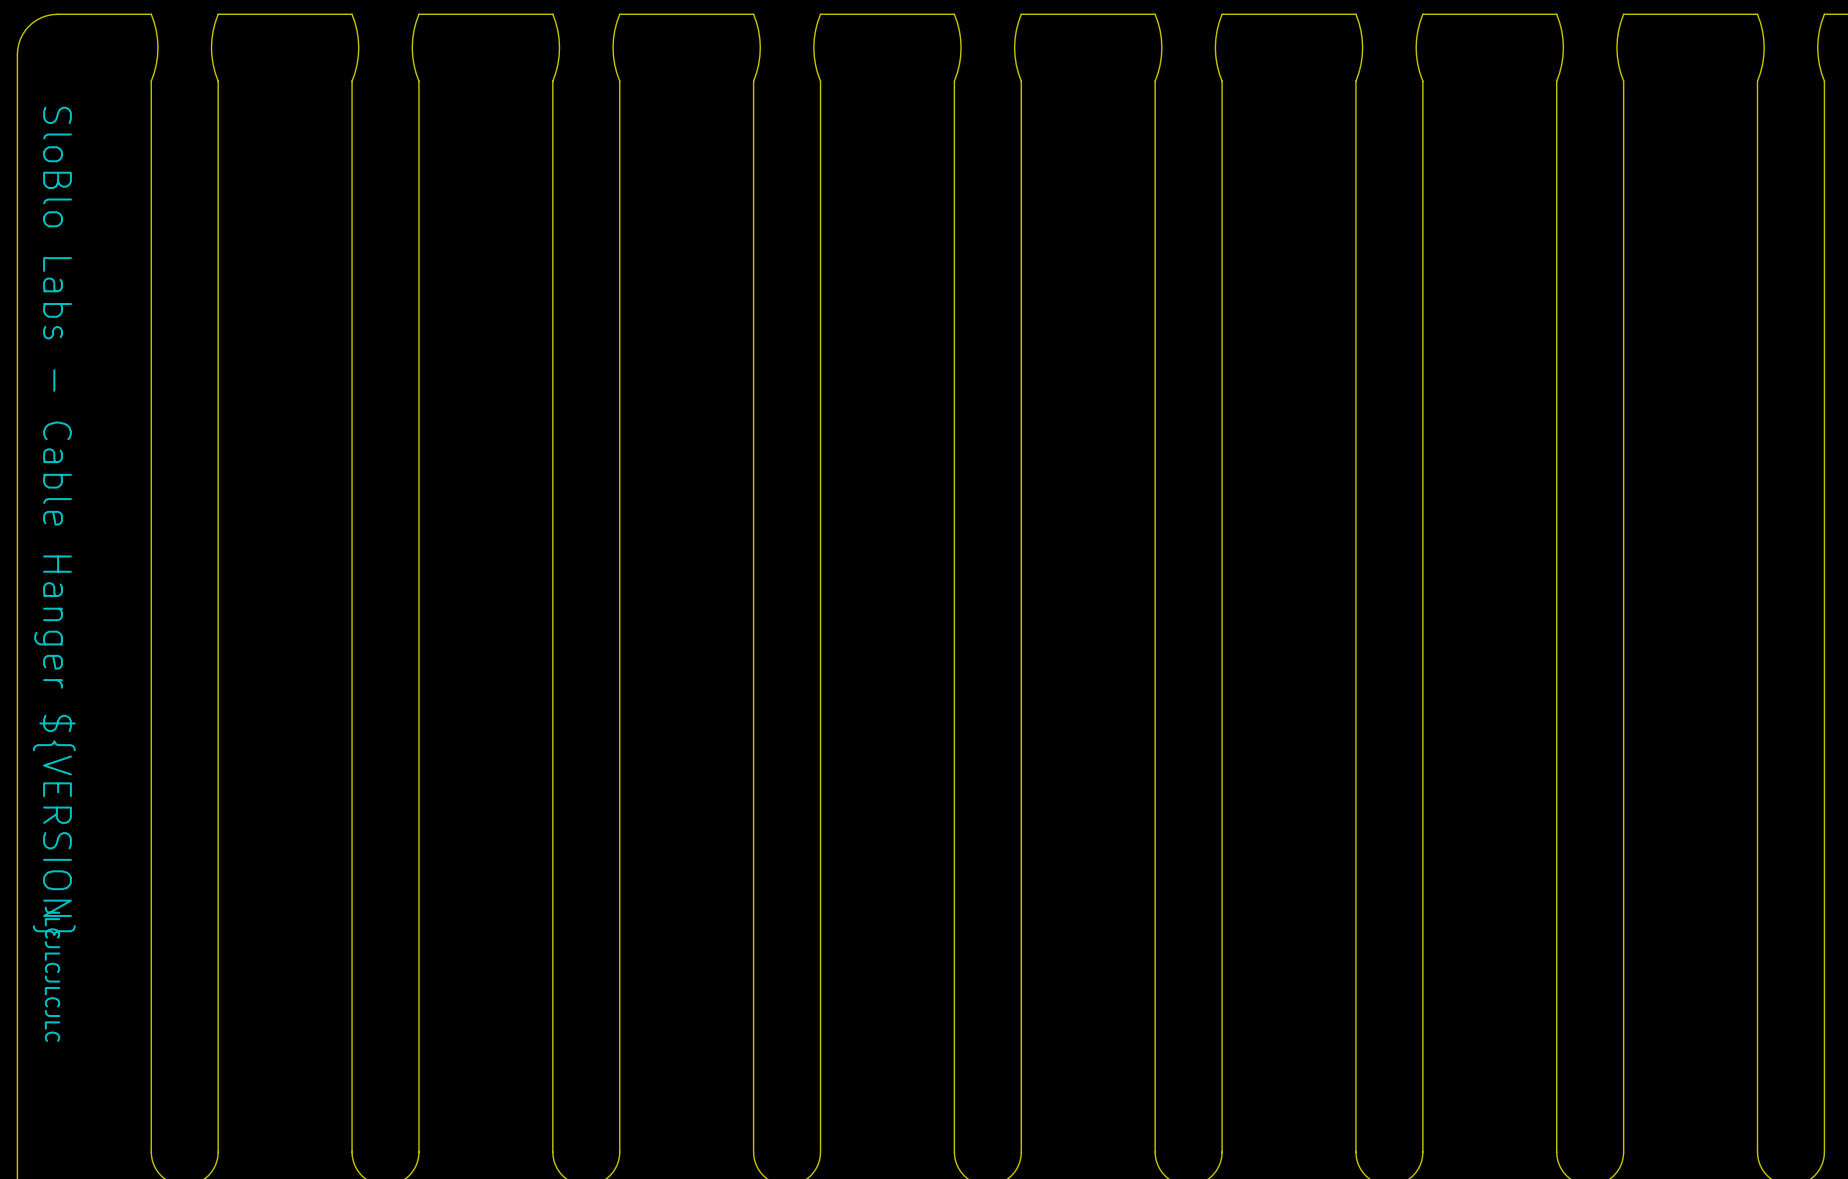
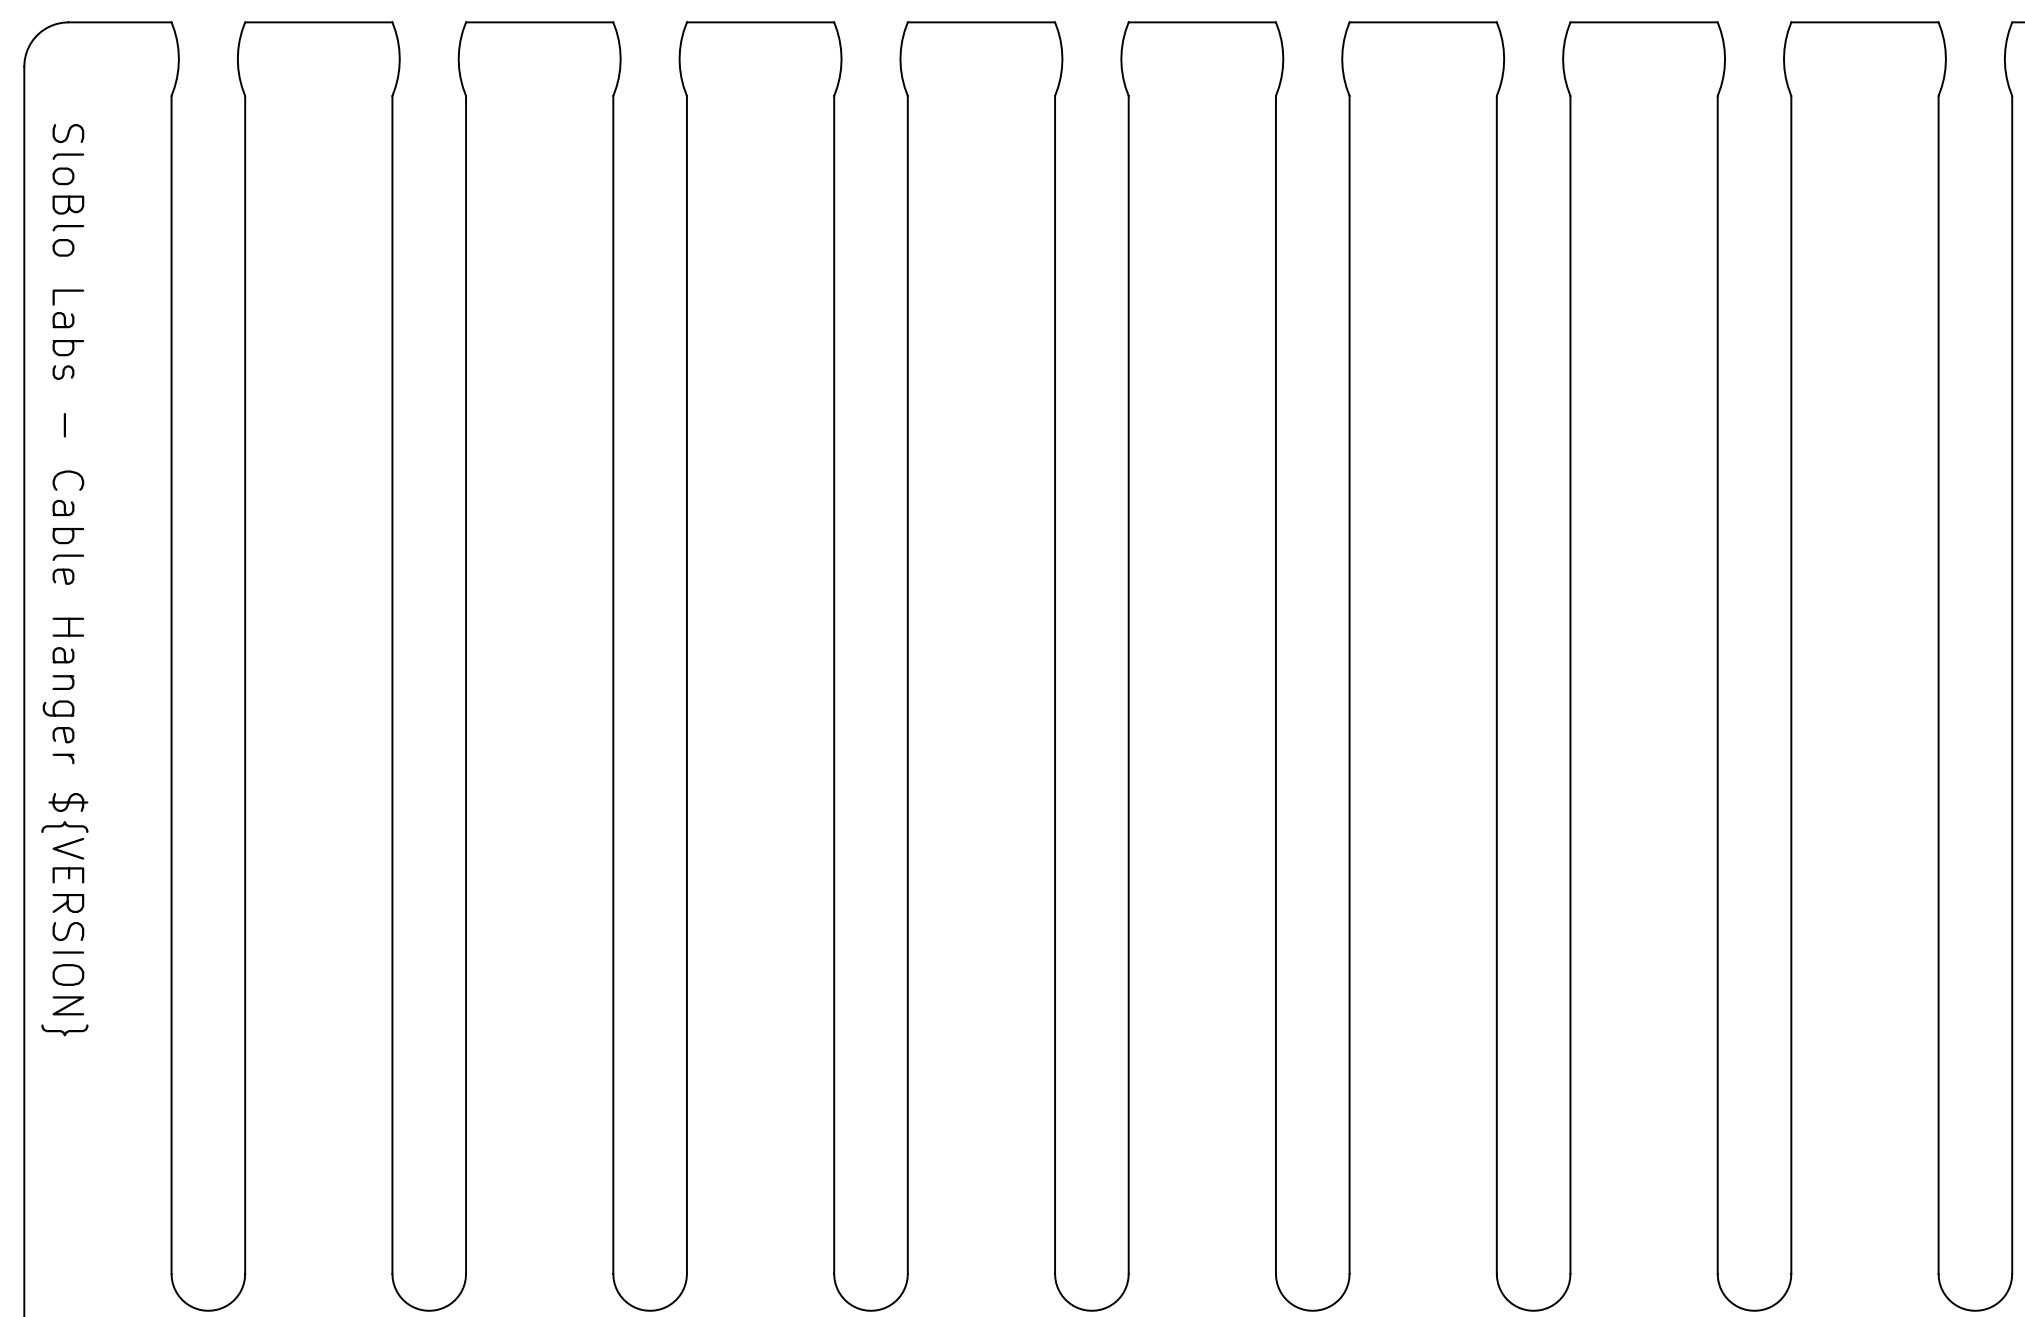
text: JLCJLCJLCJLC (52, 974) -> none

